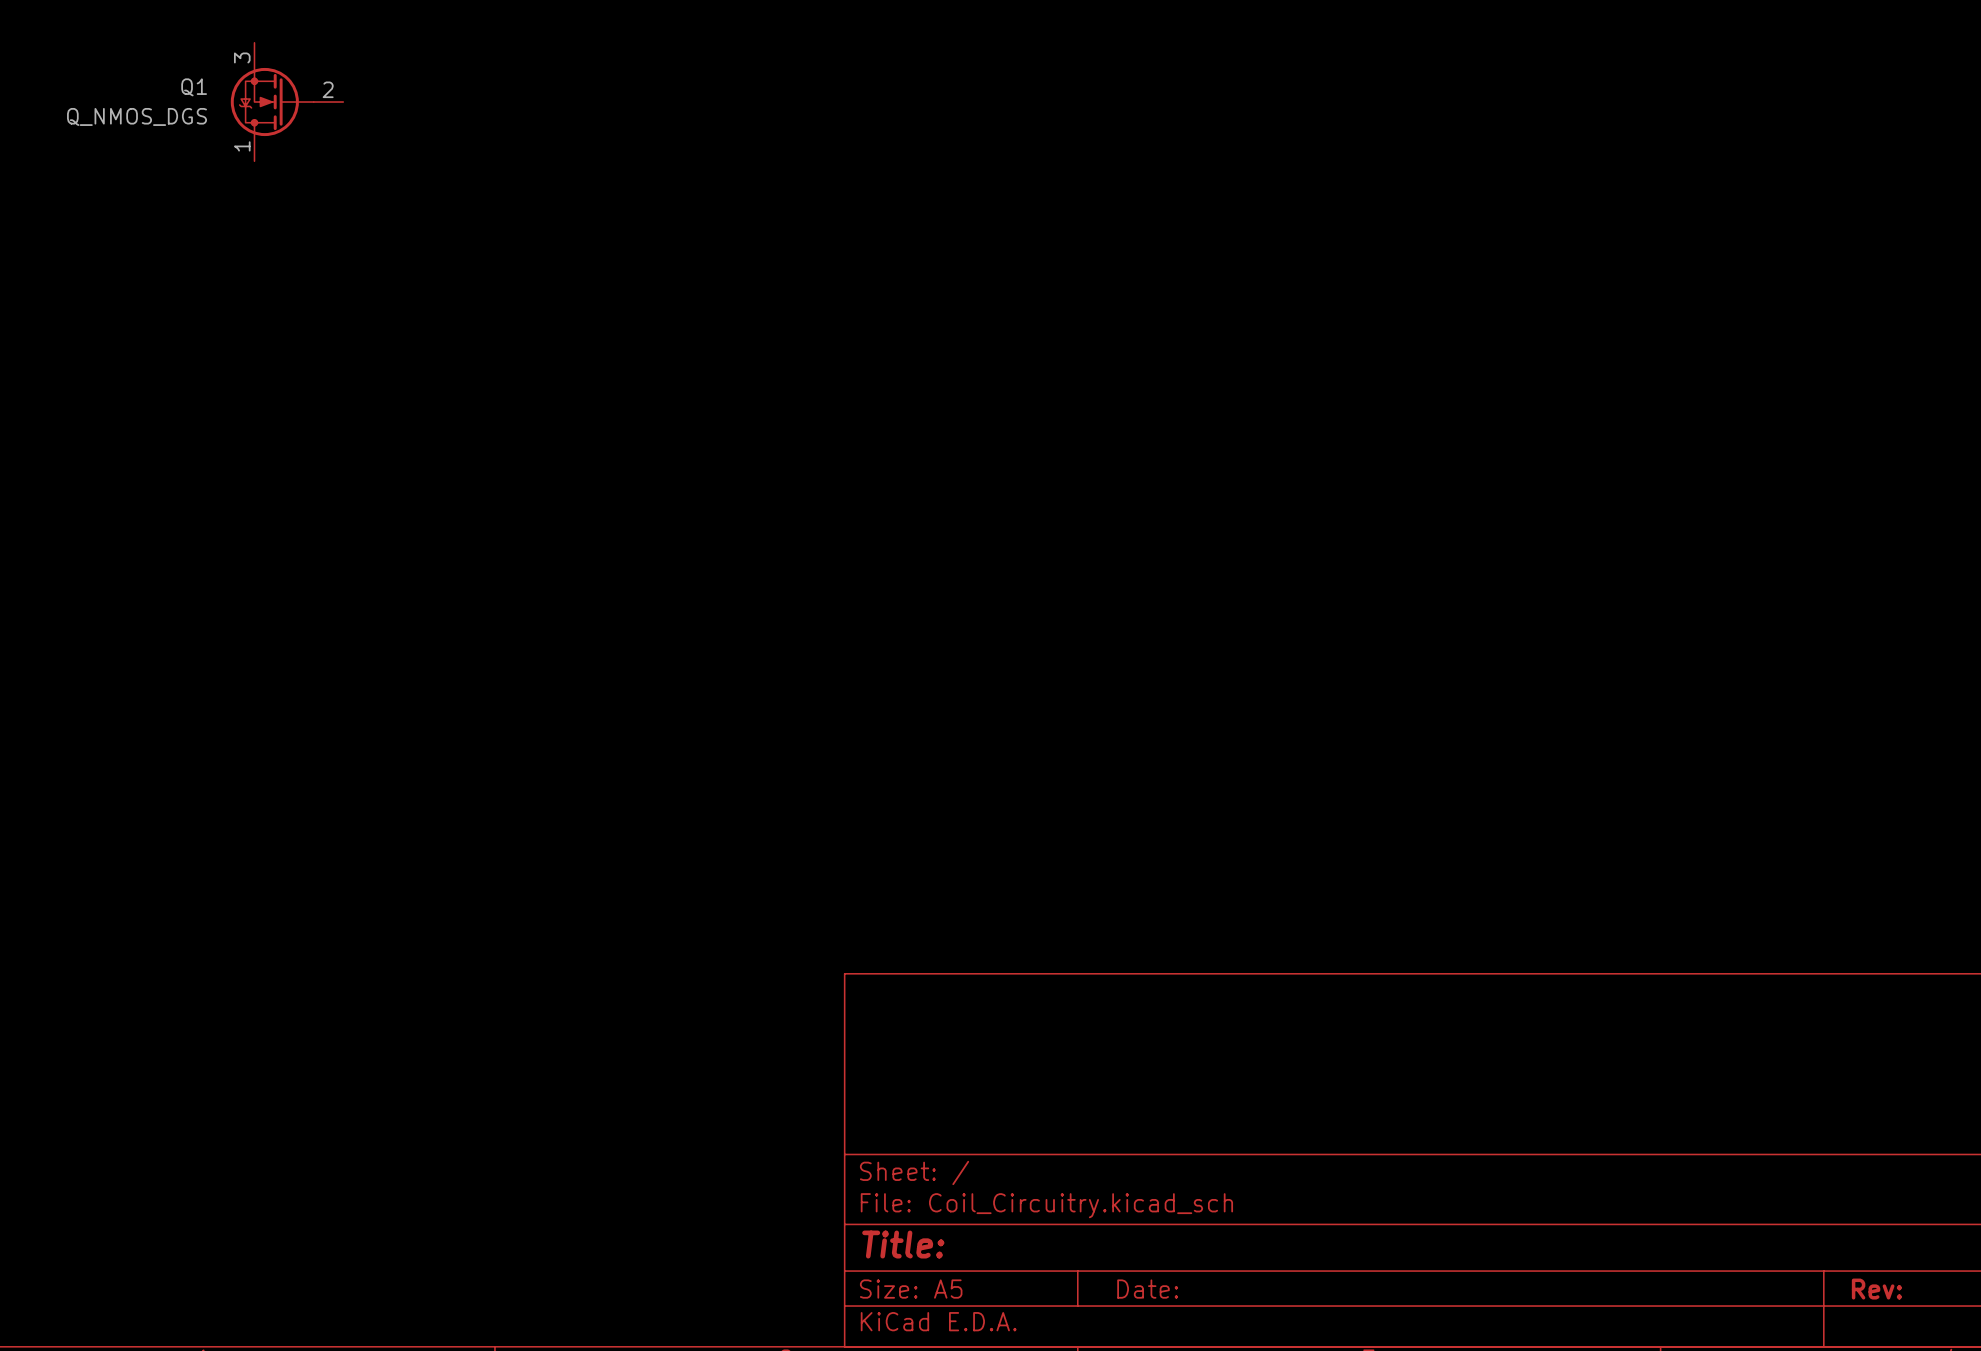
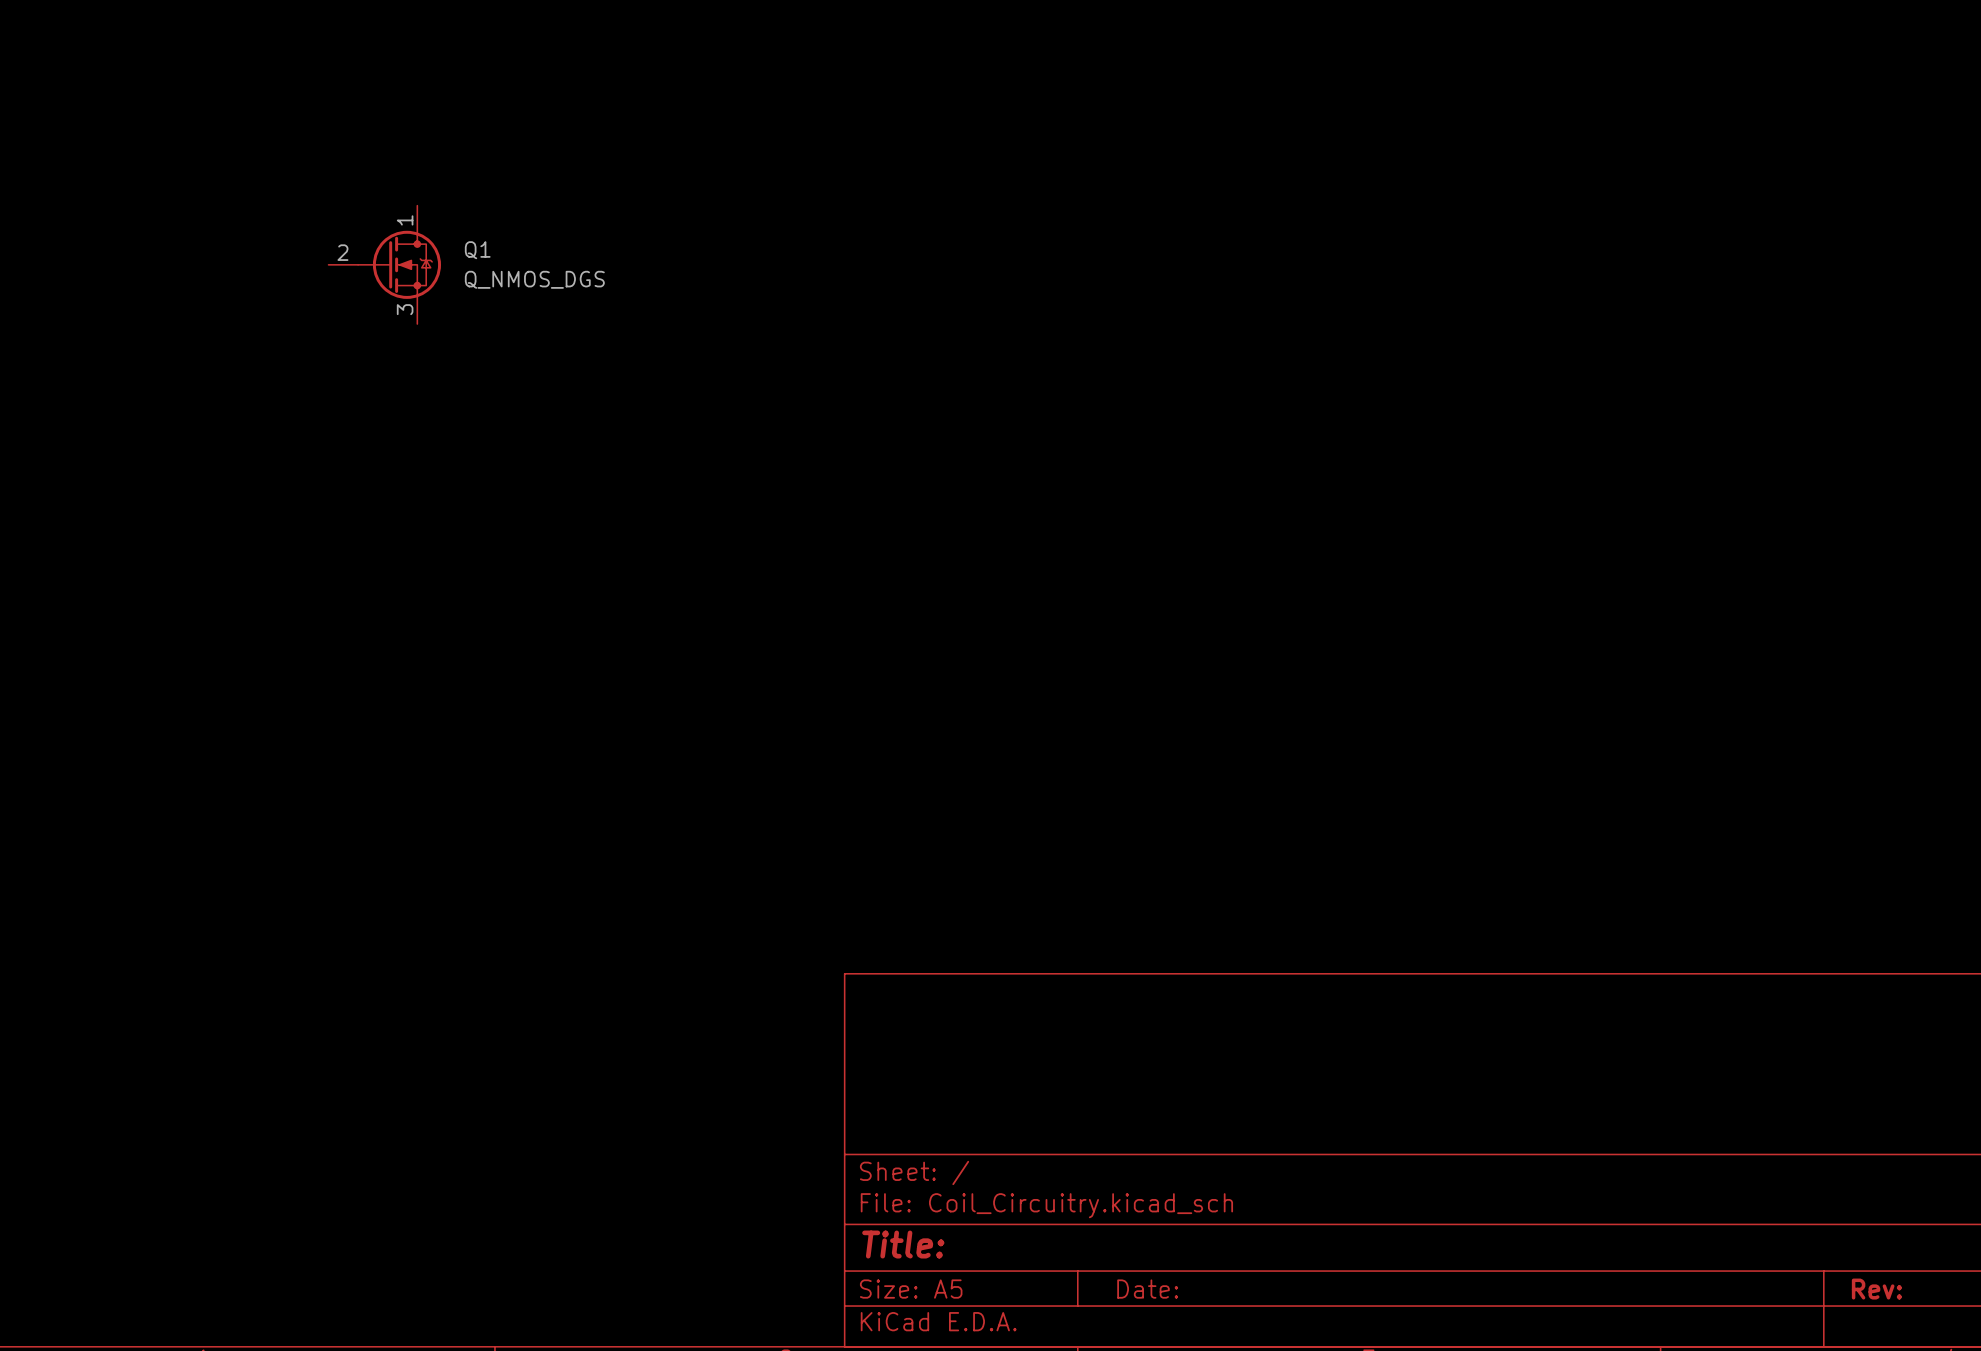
Q1 name position: Q1 (194, 87) -> Q1 (477, 250)
Q1 rotation: 0° (272, 102) -> 180° (399, 264)
Q1 position: (287, 102) -> (384, 264)
Q1 value position: Q_NMOS_DGS (137, 116) -> Q_NMOS_DGS (534, 279)

